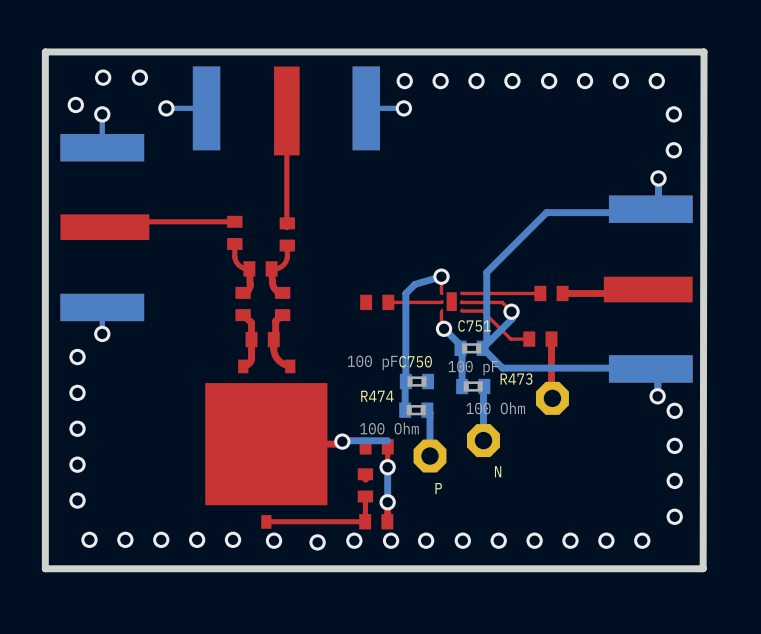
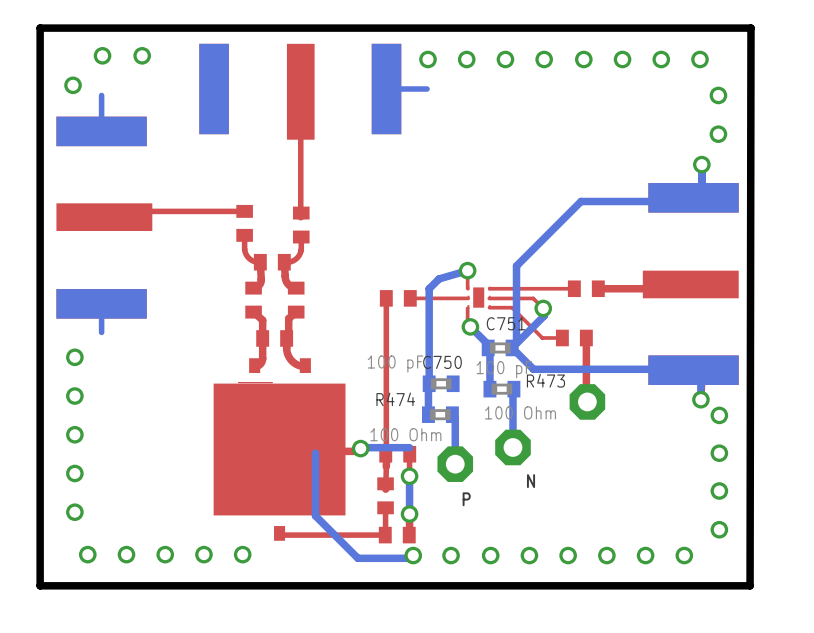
via: (166, 108) -> none
bottom track: (206, 108) (166, 108) -> none
via: (403, 108) -> none
via: (102, 114) -> none
top track: none -> (386, 298) (385, 489)
via: (102, 333) -> none
part footprint: [205, 359, 328, 529] -> [213, 358, 346, 541]
bottom track: none -> (315, 453) (315, 515) (357, 558) (410, 558)
via: (274, 540) -> none
via: (354, 540) -> none
via: (317, 542) -> none

